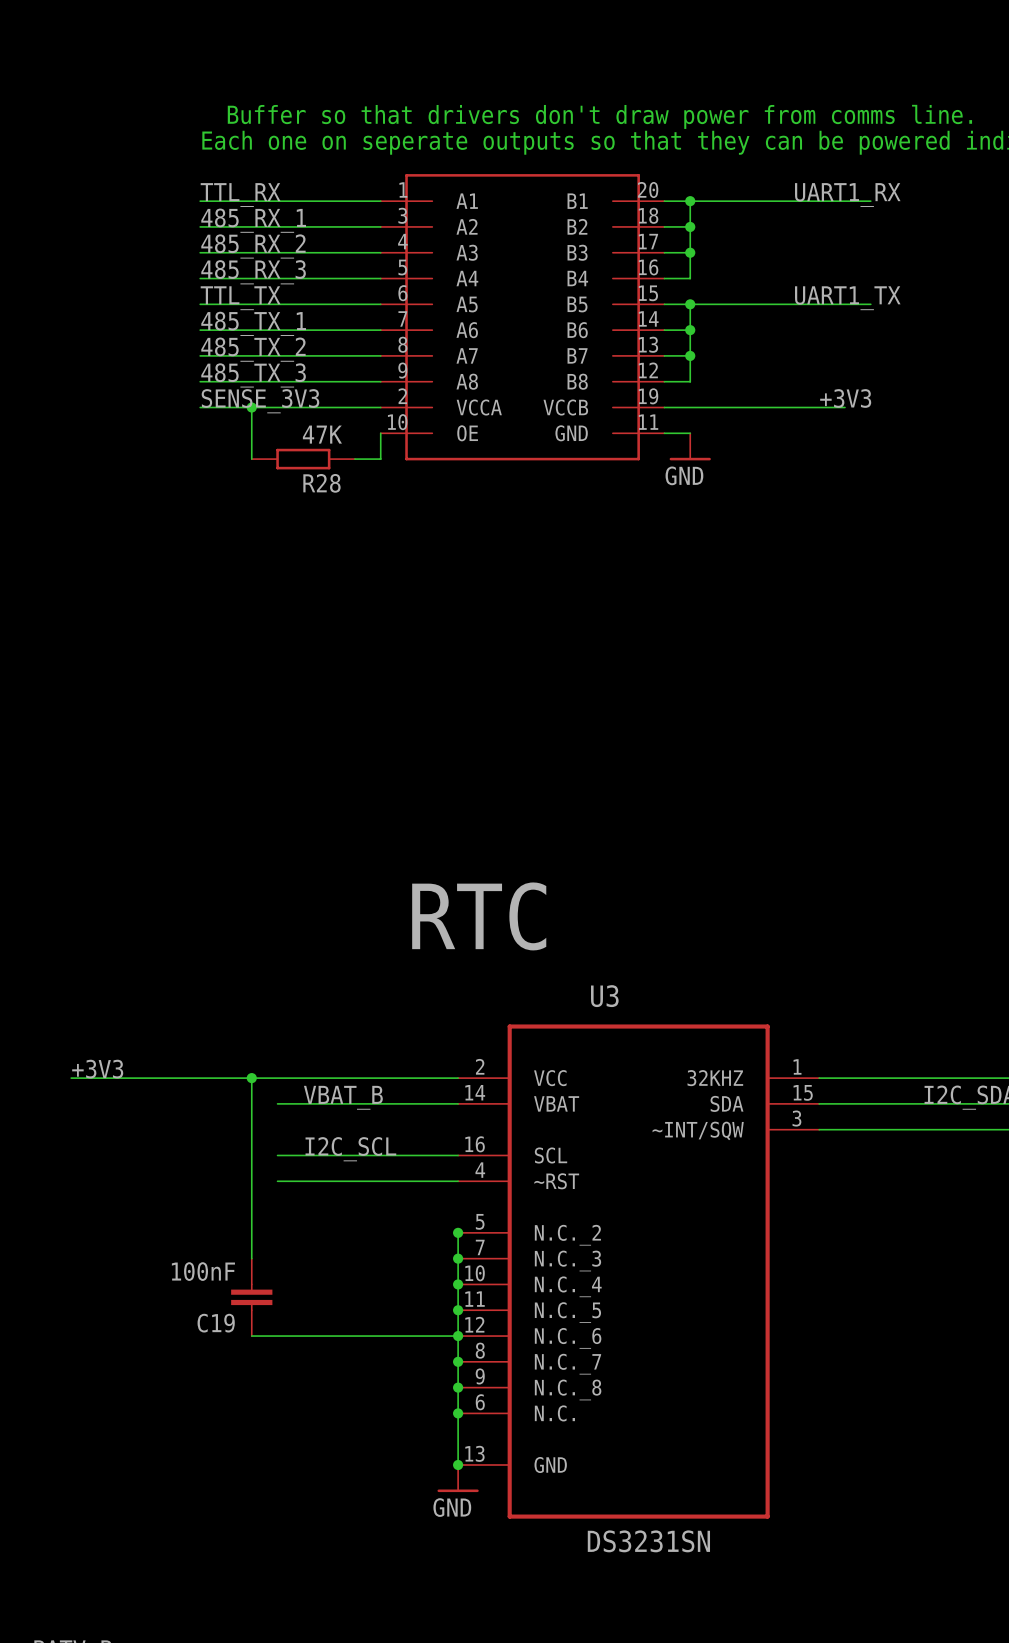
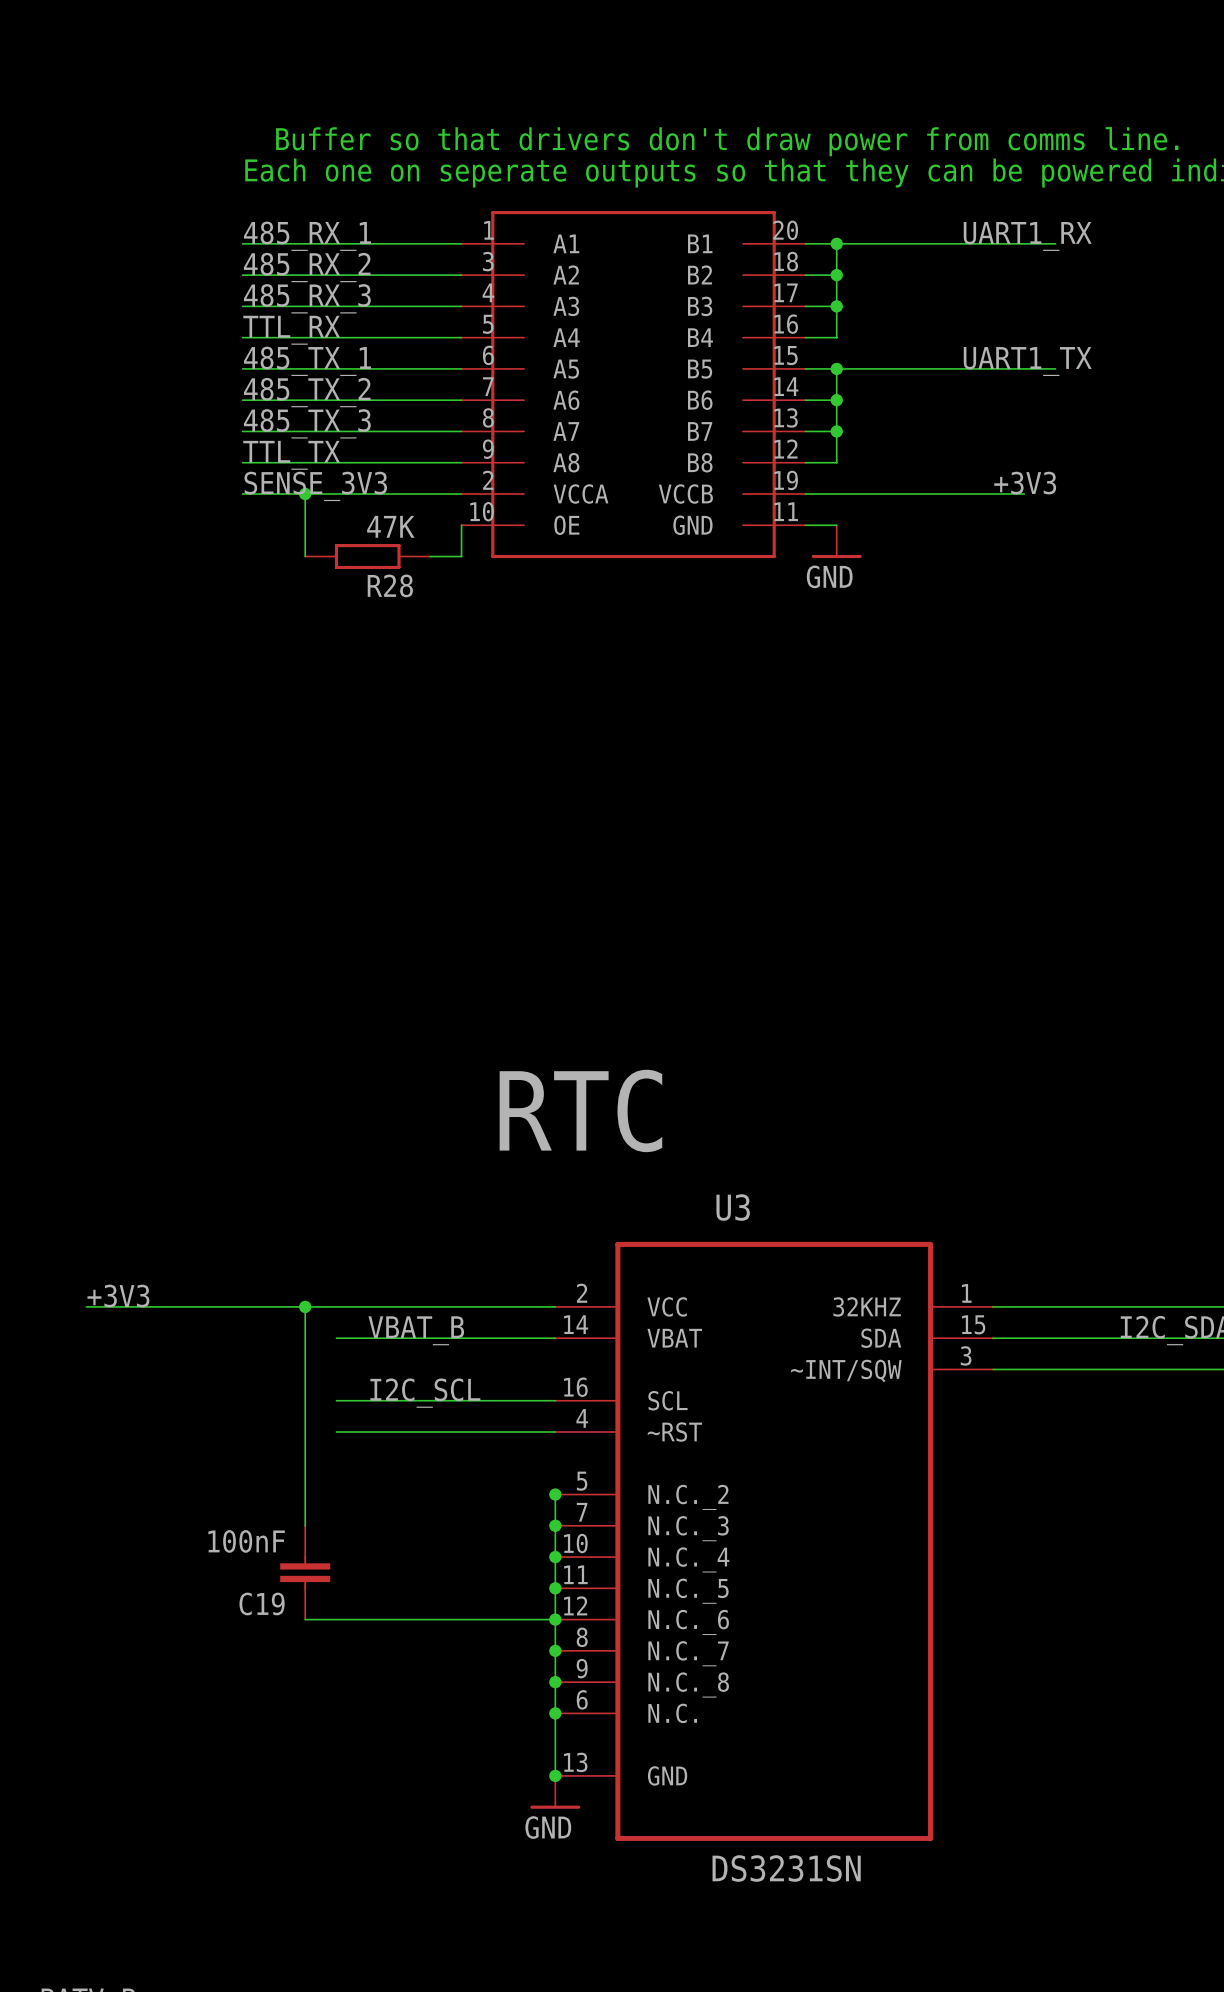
label: TTL_RX (240, 195) -> 485_RX_1 (307, 236)
label: 485_RX_1 (253, 220) -> 485_RX_2 (307, 267)
label: 485_RX_2 (253, 246) -> 485_RX_3 (307, 298)
label: 485_RX_3 (253, 272) -> TTL_RX (291, 330)
label: TTL_TX (240, 298) -> 485_TX_1 (307, 361)
label: 485_TX_1 (253, 323) -> 485_TX_2 (307, 392)
label: 485_TX_2 (253, 349) -> 485_TX_3 (307, 423)
label: 485_TX_3 (253, 375) -> TTL_TX (291, 455)

